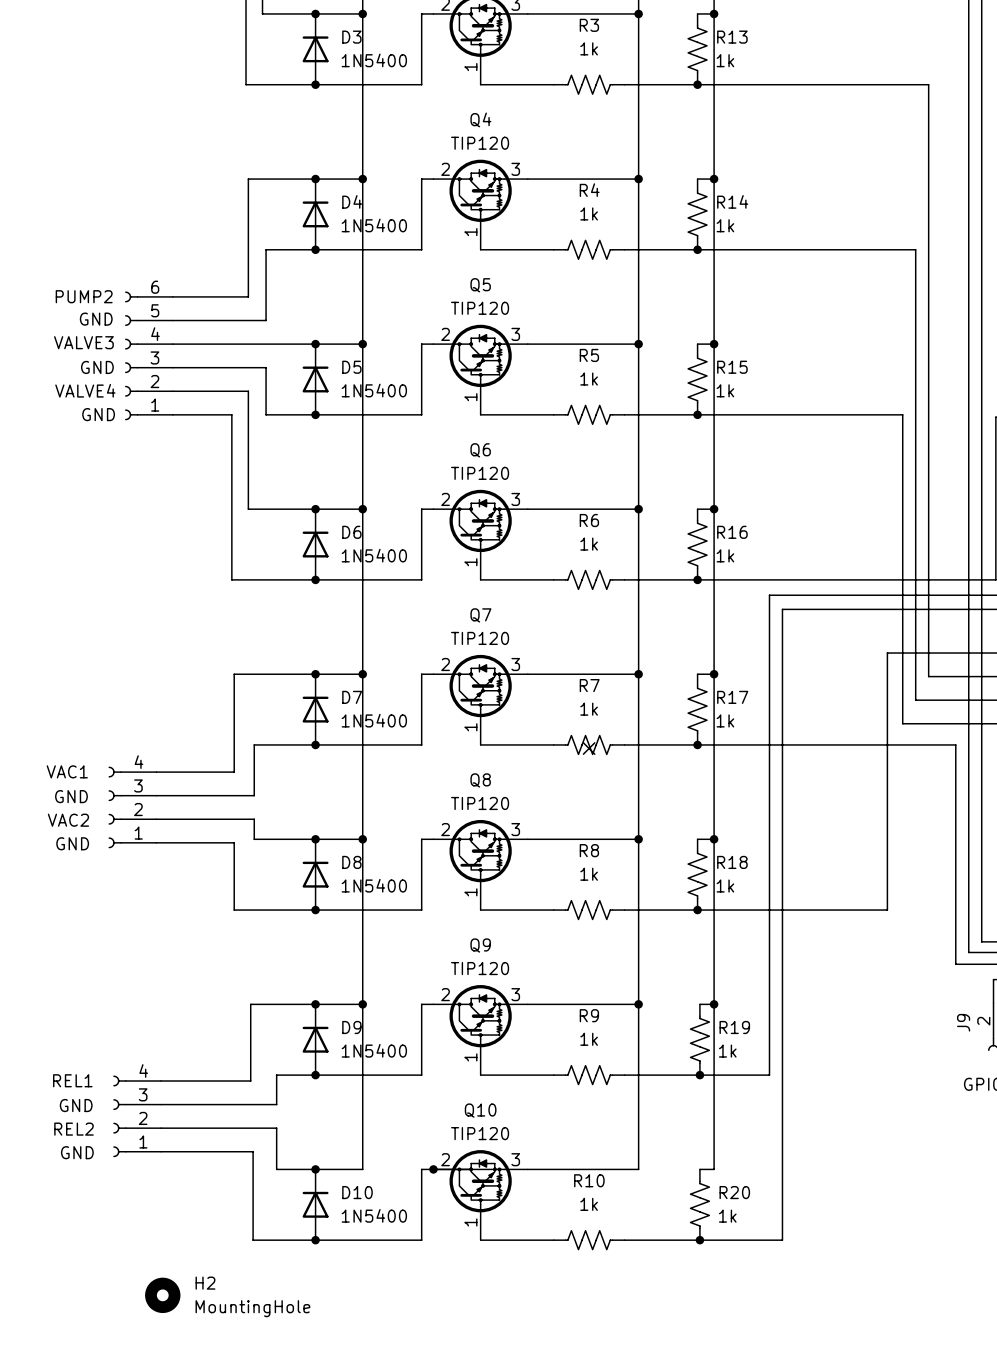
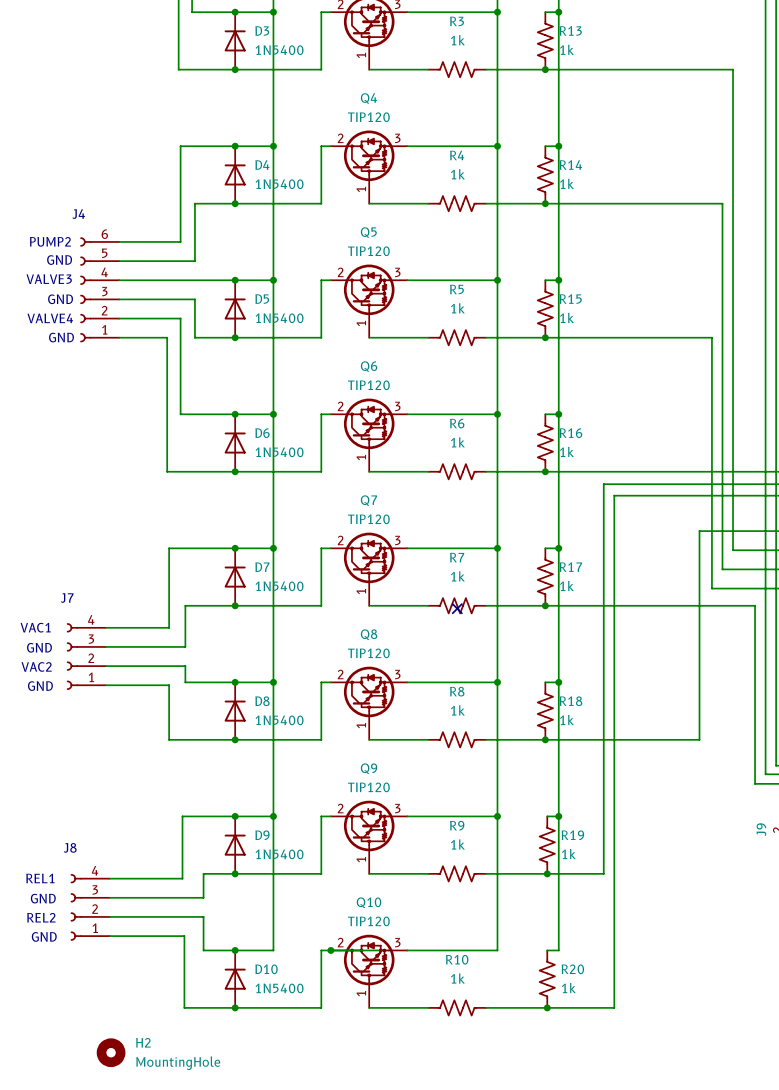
text: none -> J4 (78, 214)
text: none -> J7 (67, 598)
text: none -> J8 (70, 847)

